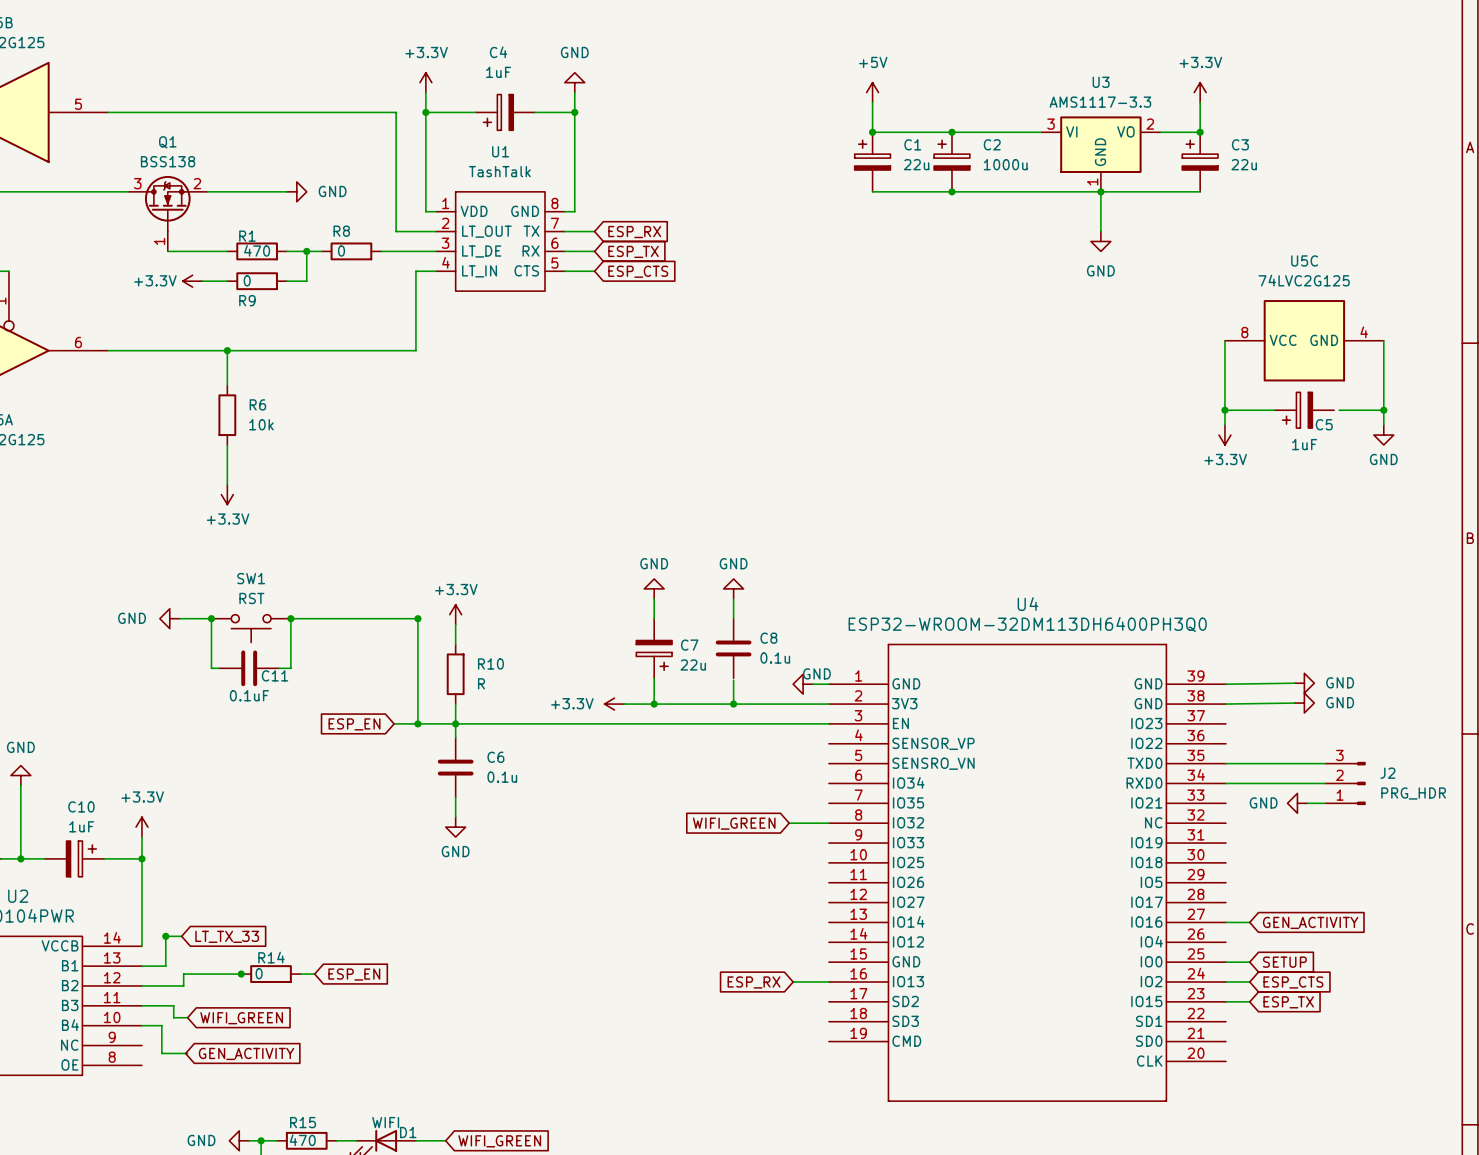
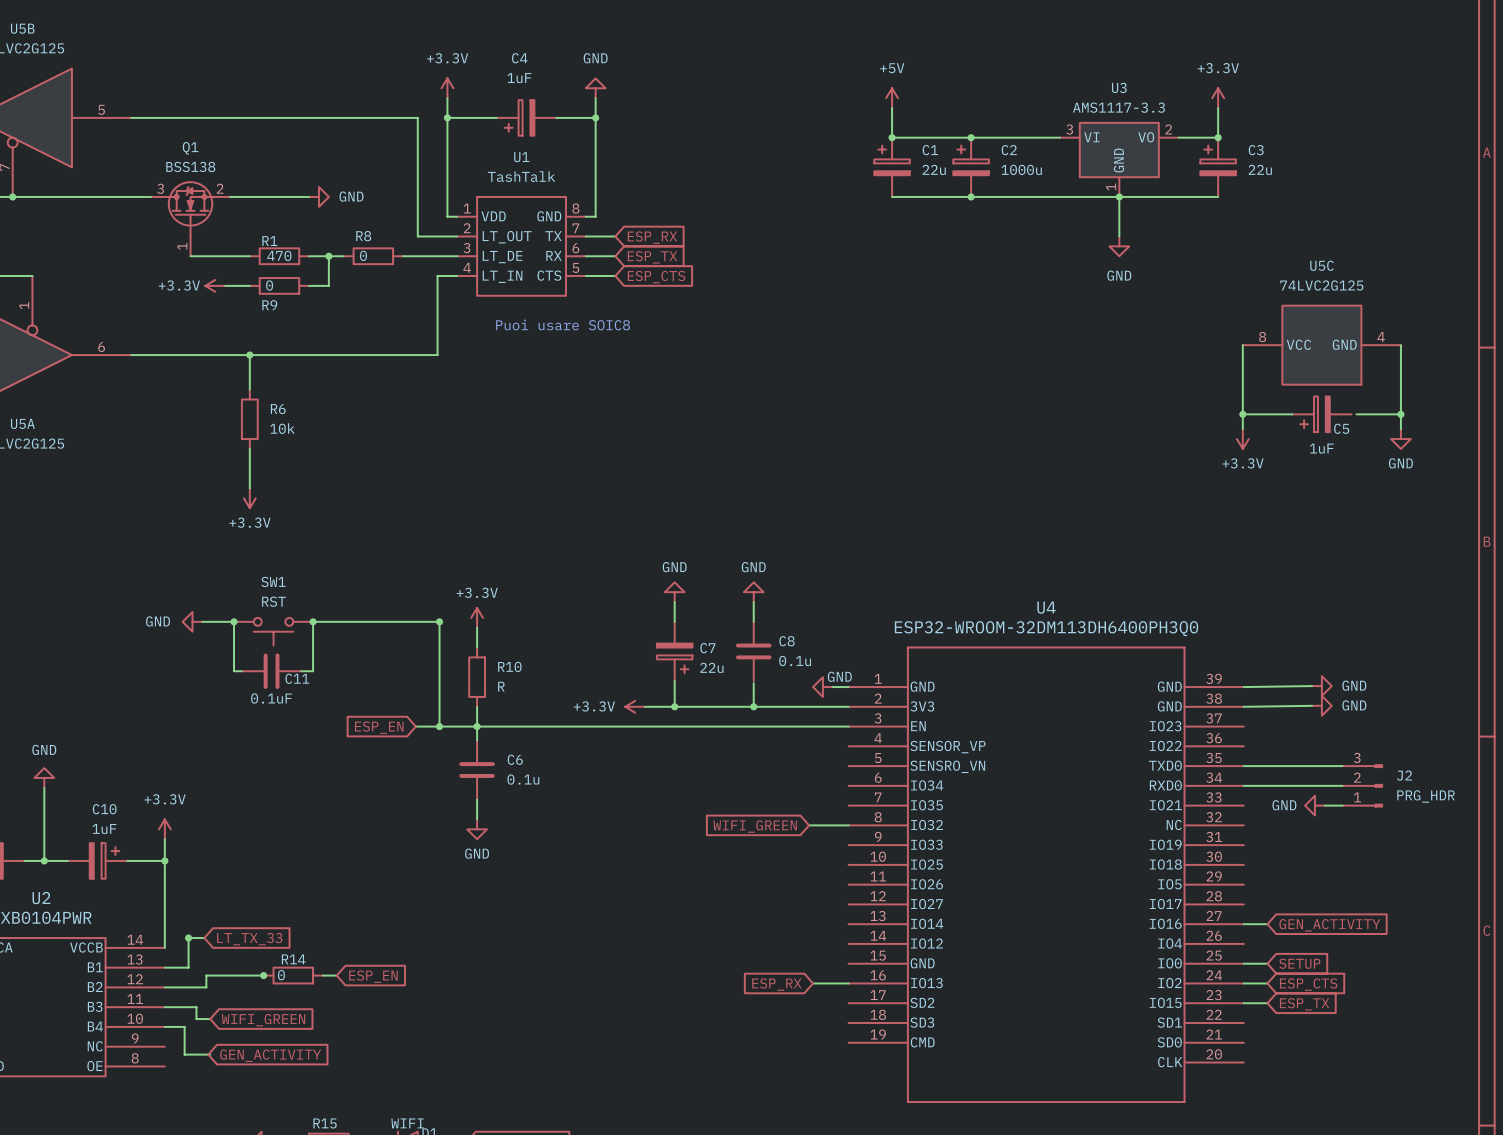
text: none -> Puoi usare SOIC8 (563, 324)

